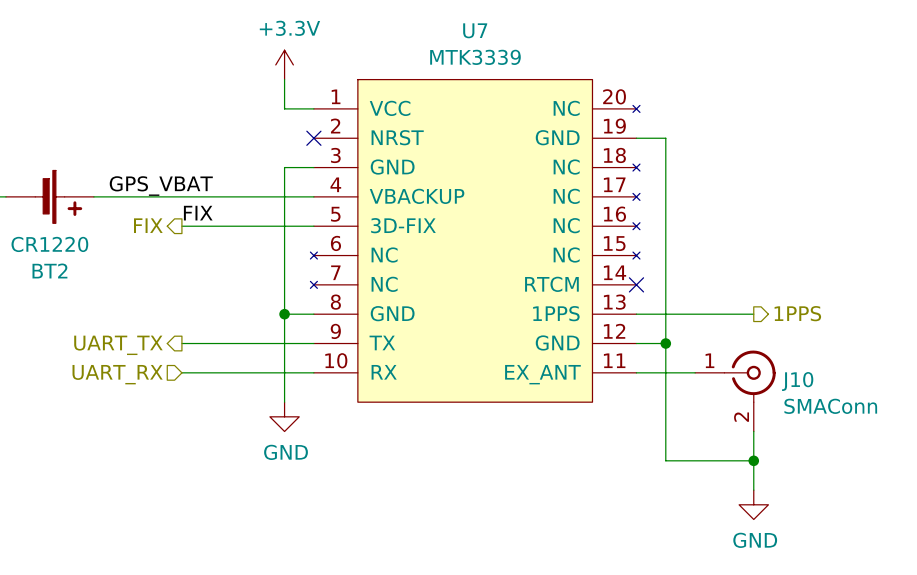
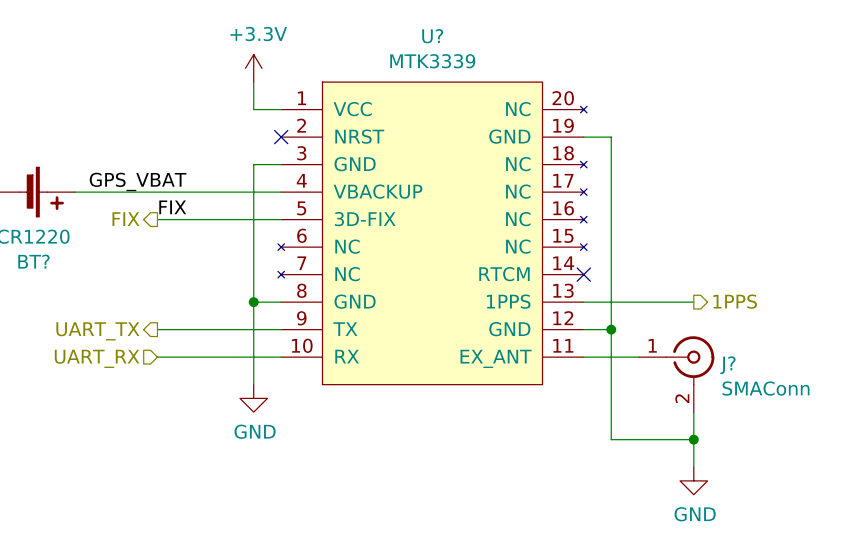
U7 name: U7 (475, 30) -> U? (432, 36)
BT2 name: BT2 (49, 270) -> BT? (33, 261)
J10 name: J10 (797, 381) -> J? (727, 365)

